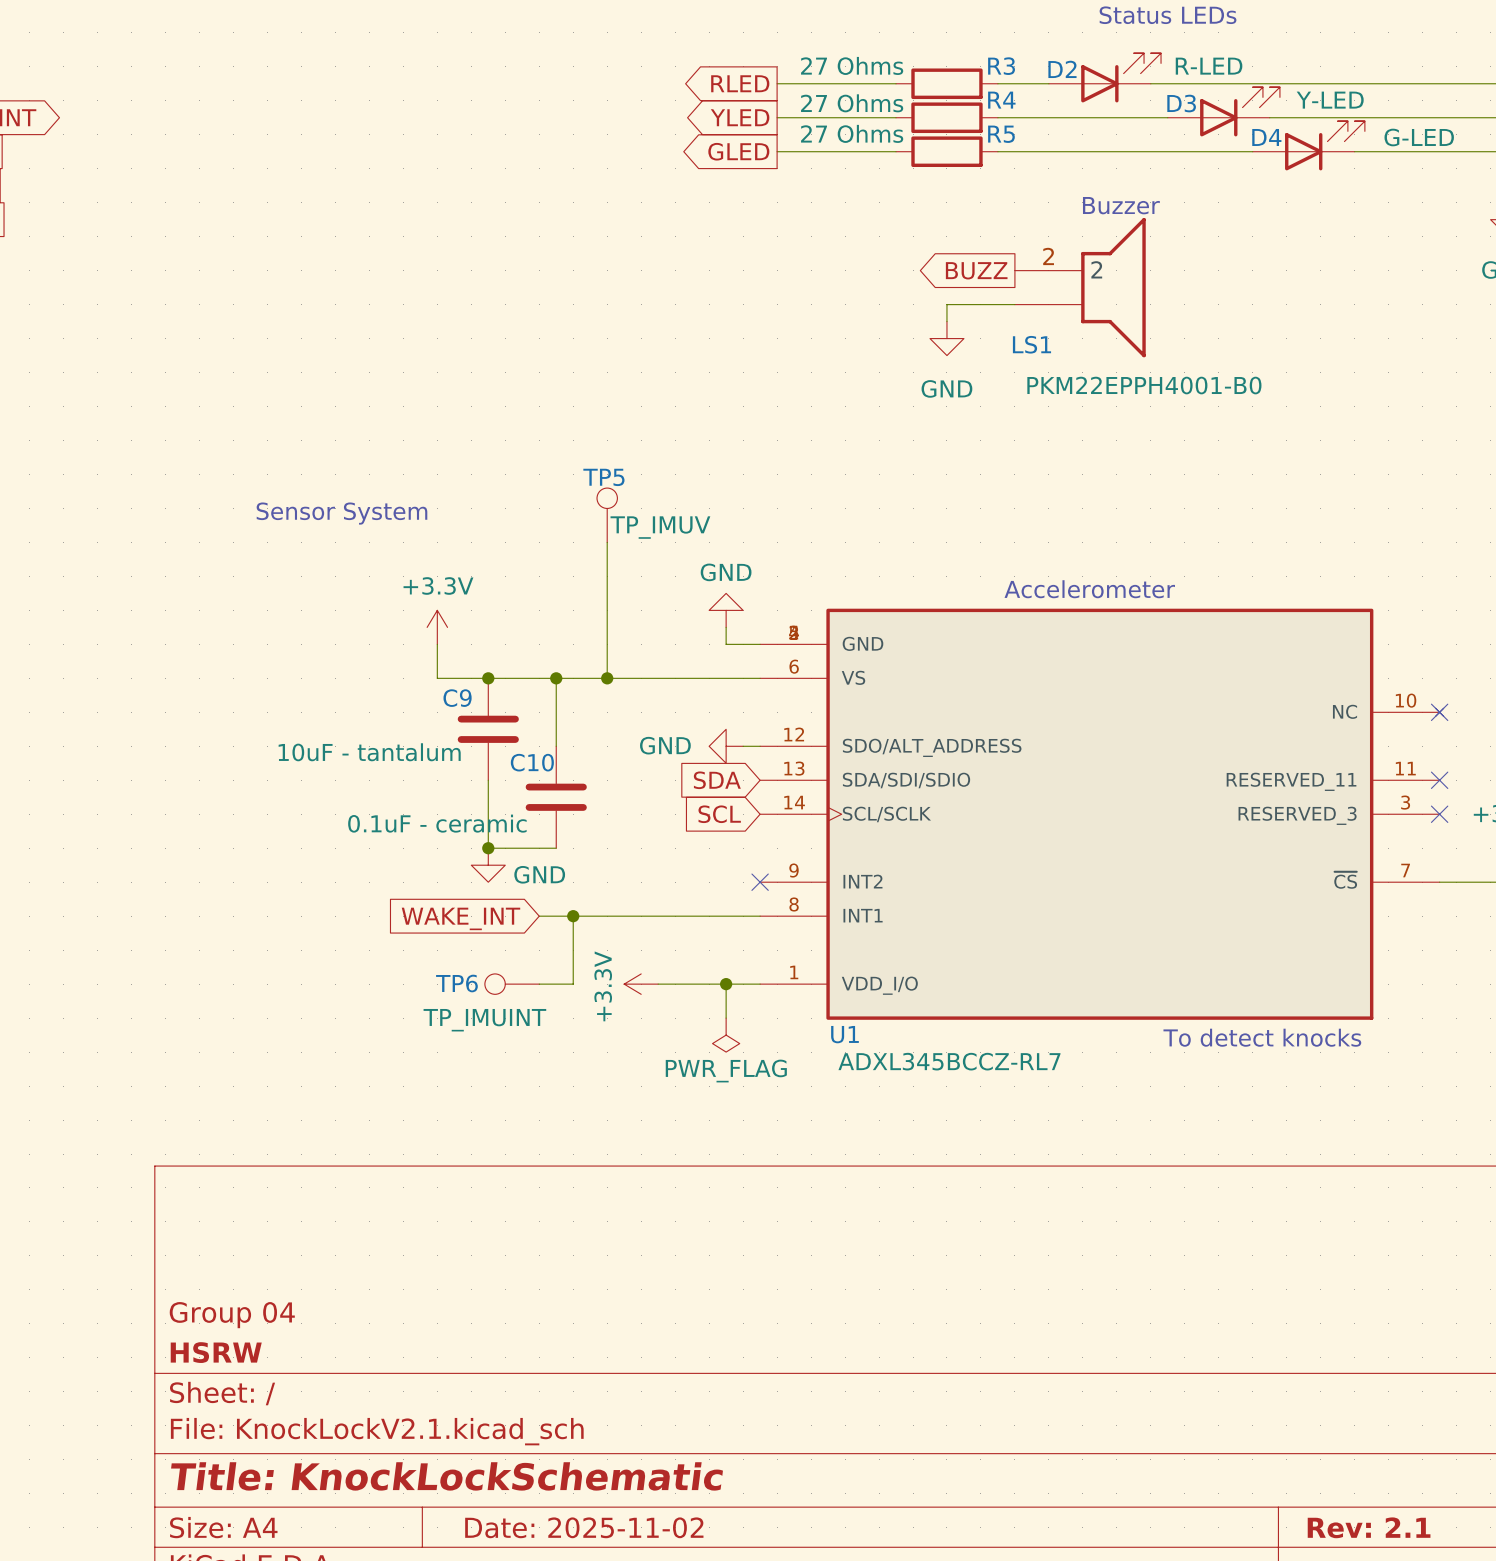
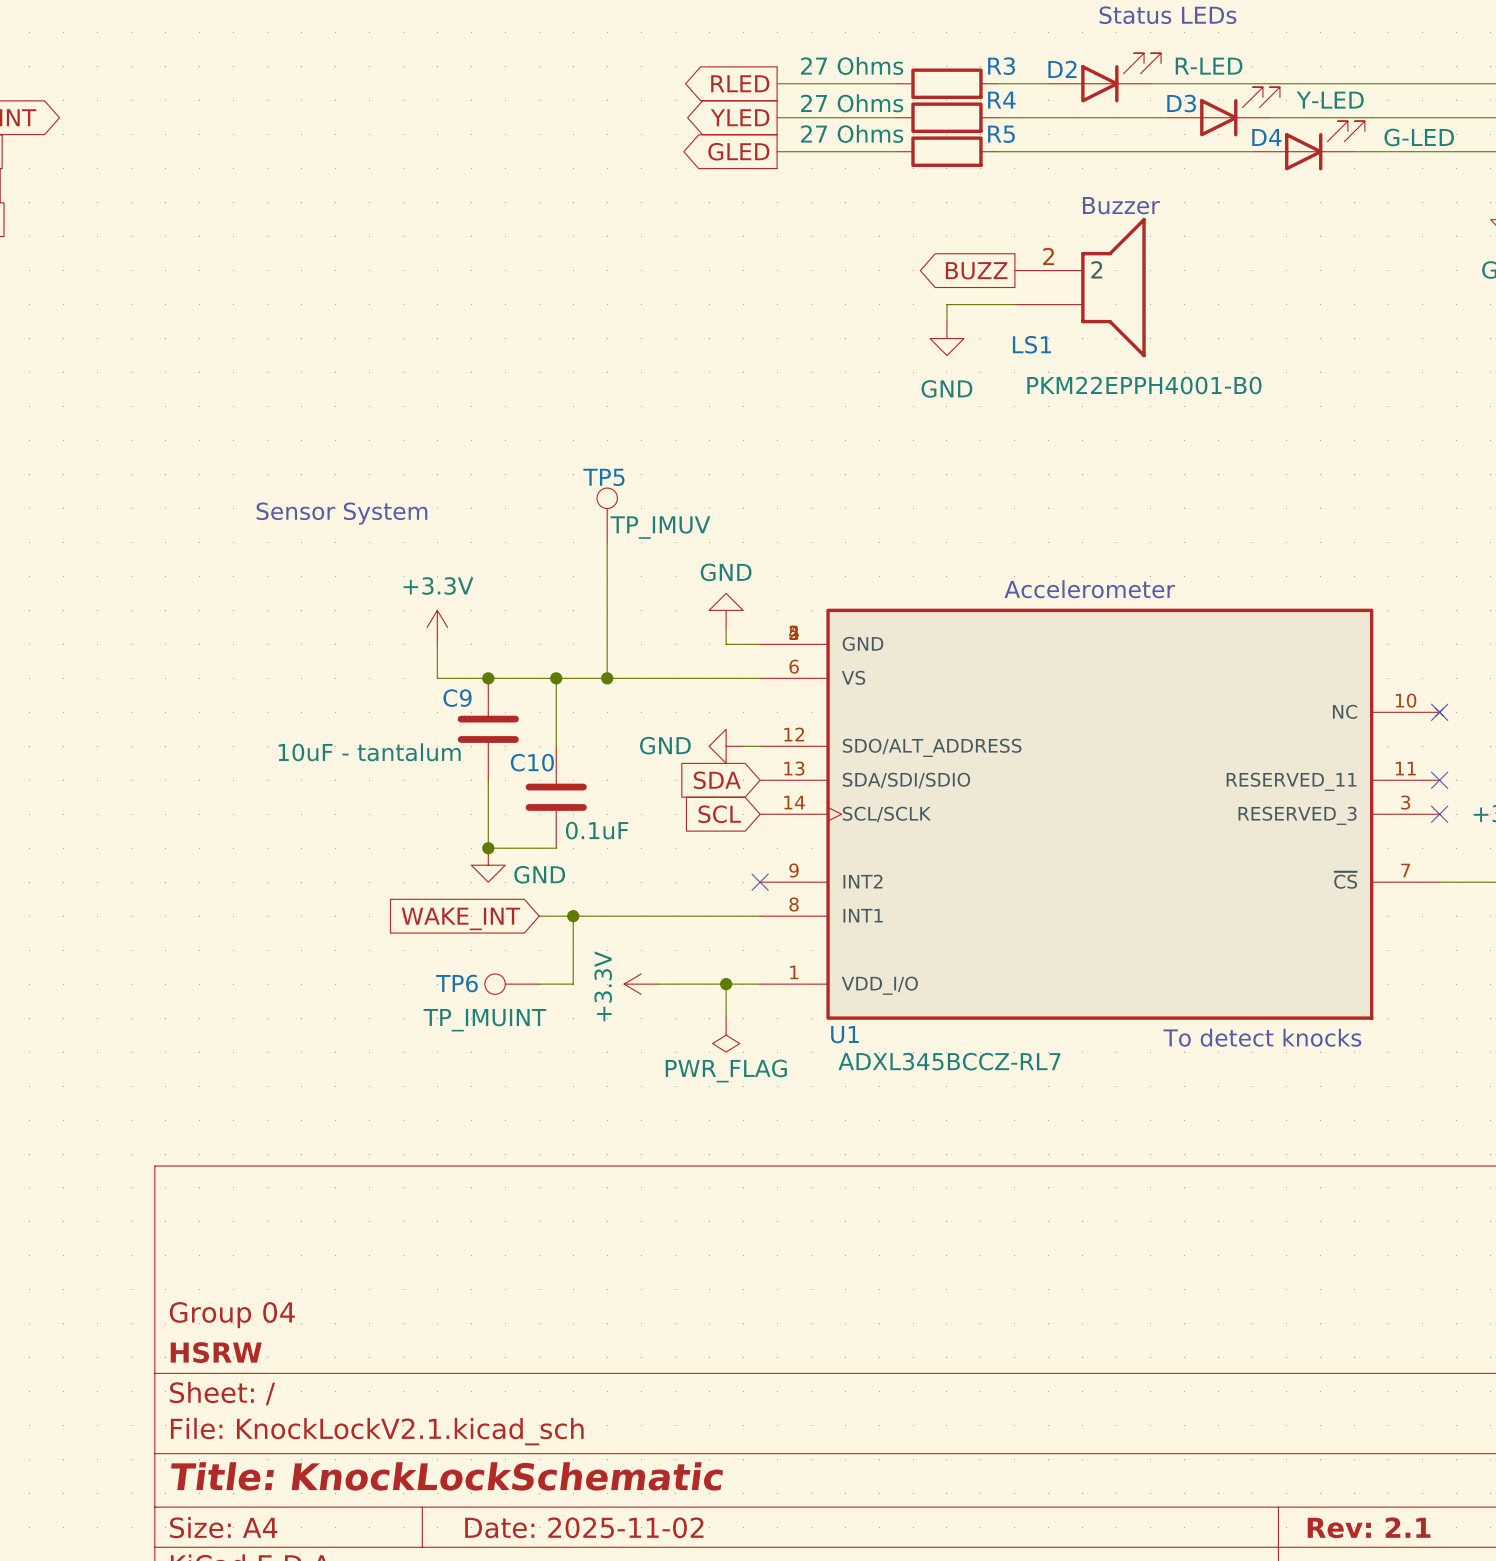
C10 value: 0.1uF - ceramic (437, 823) -> 0.1uF (597, 830)

